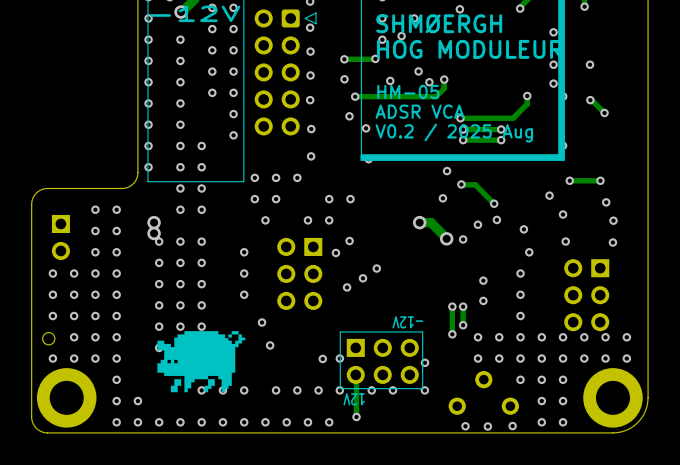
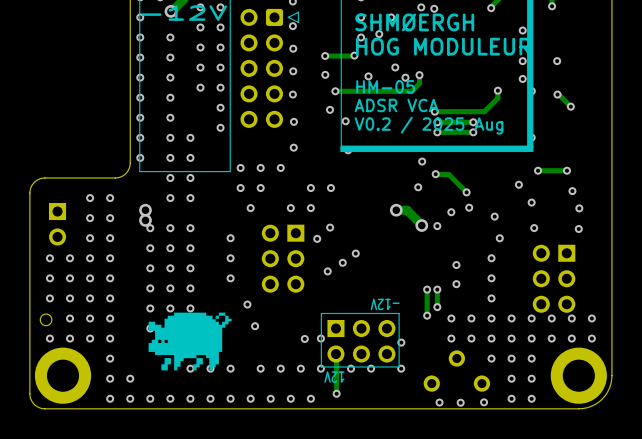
via: none -> (421, 7)

